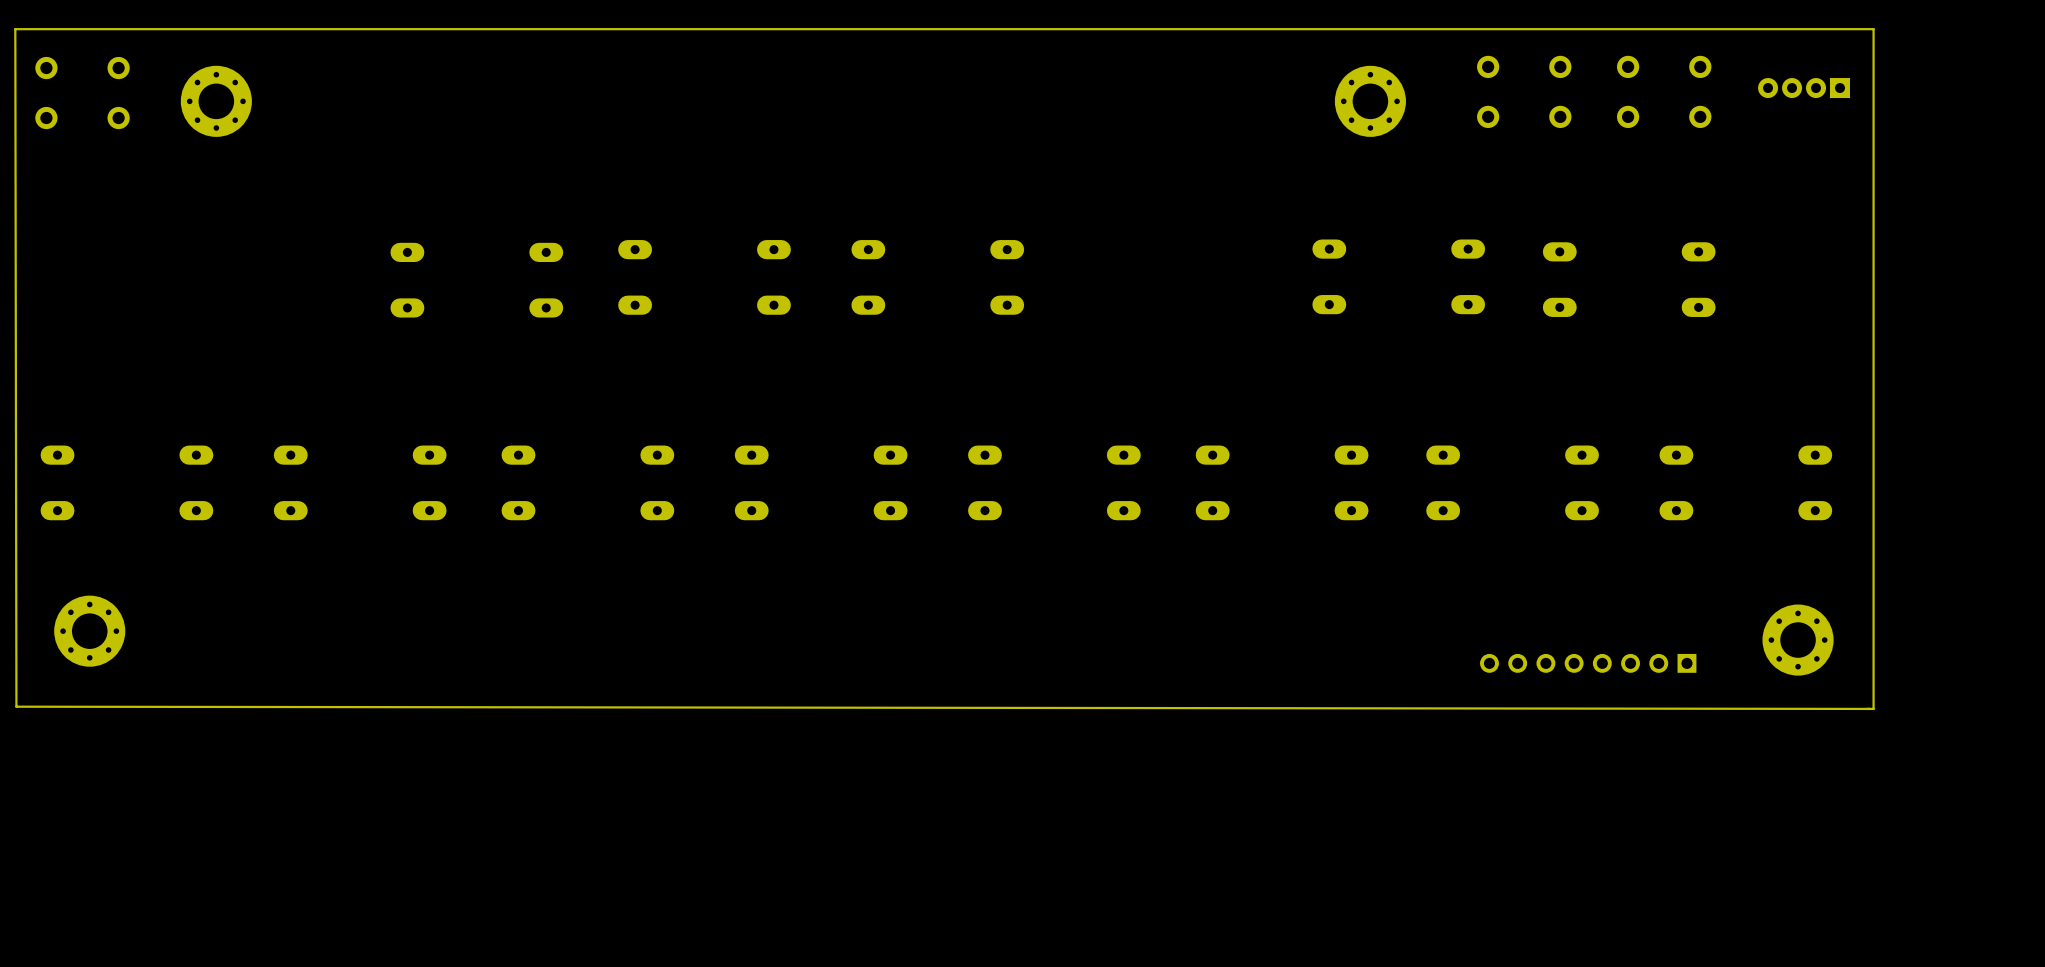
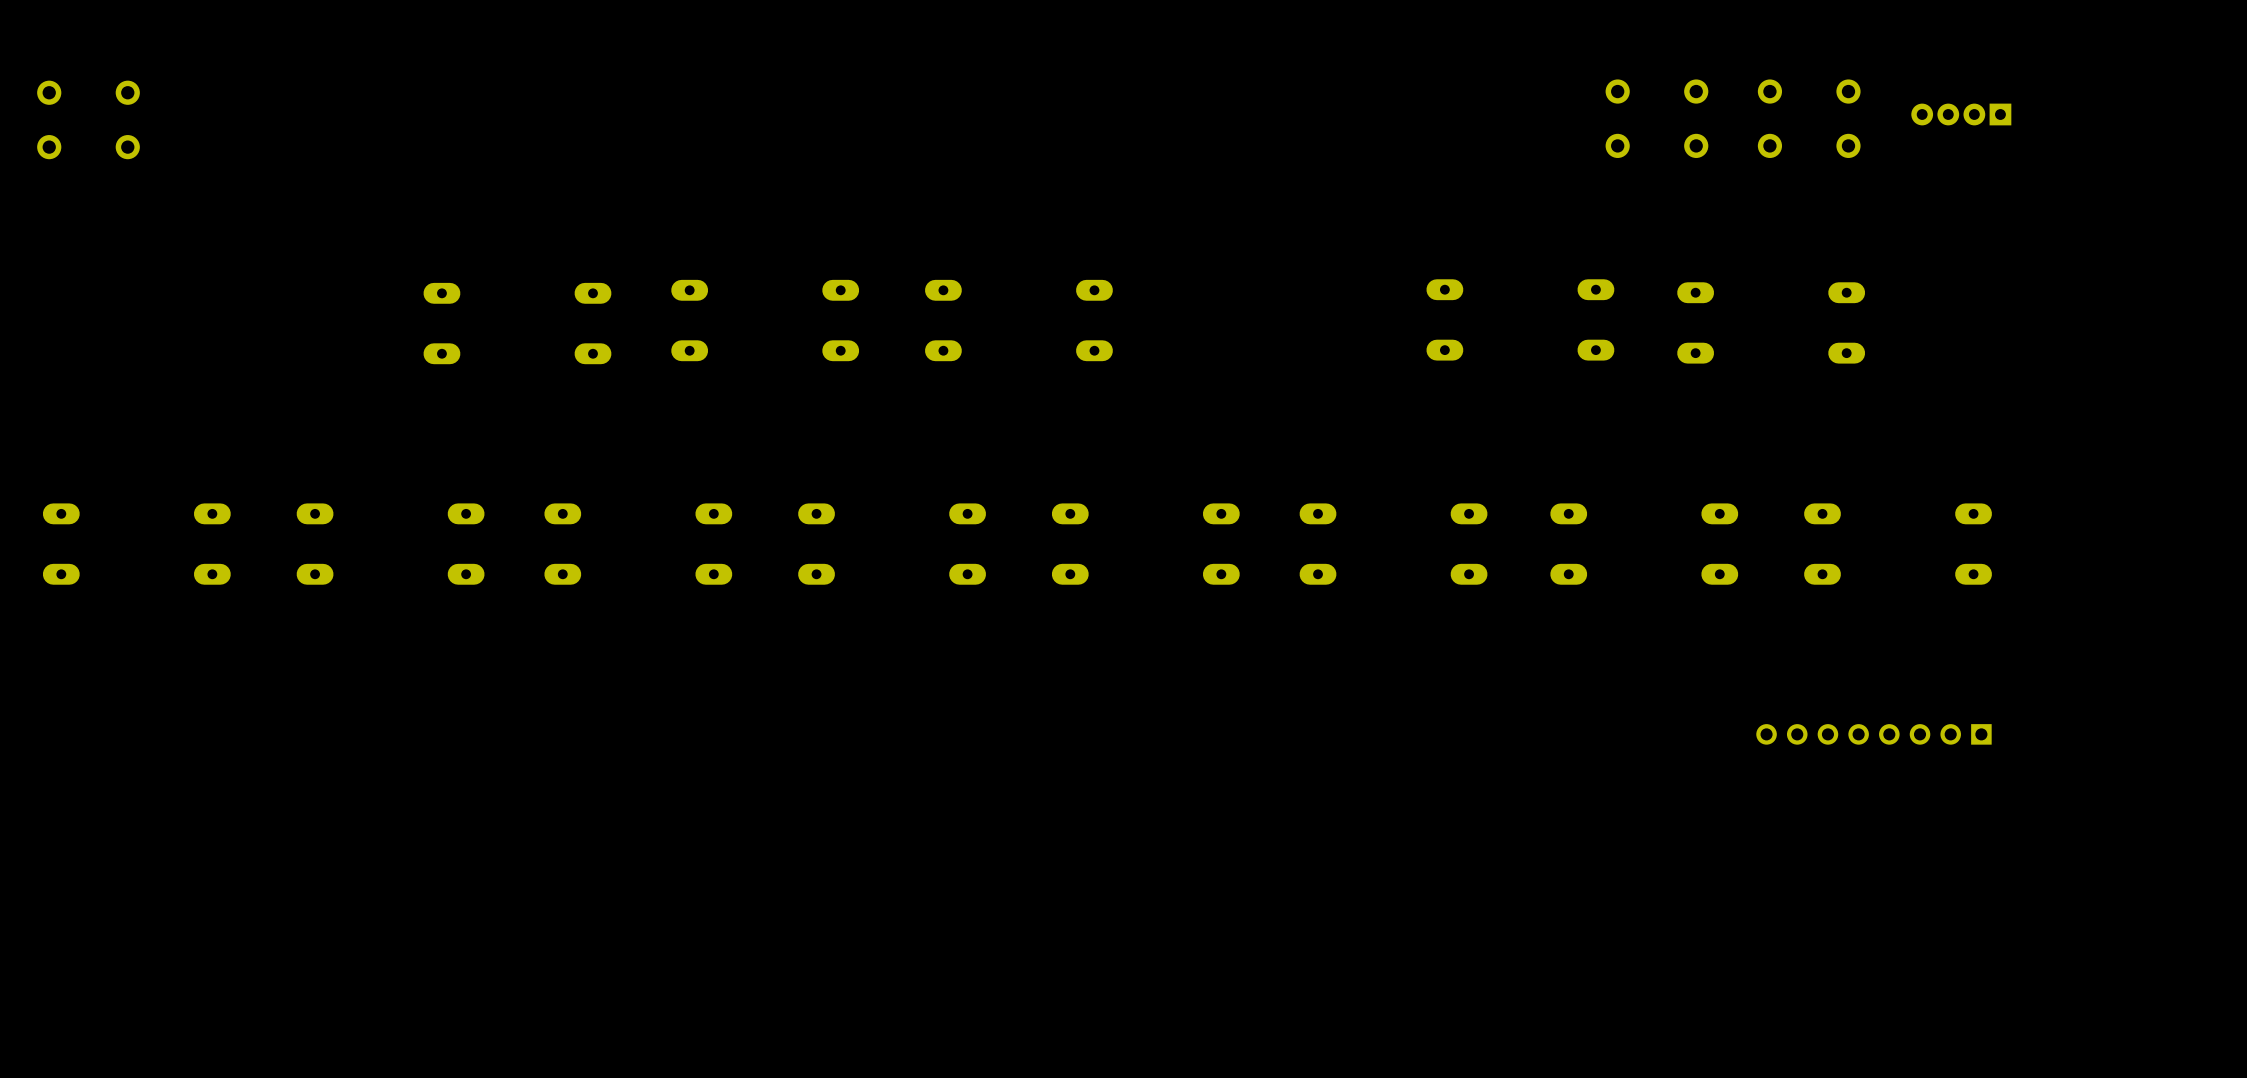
part: (216, 101) -> none
part: (1370, 101) -> none
part: (89, 631) -> none
part: (1798, 640) -> none
part position: (1588, 663) -> (1873, 734)
board edge: (1870, 708) (16, 706) (15, 29) (1873, 29) (1873, 708) (1866, 708) -> none

